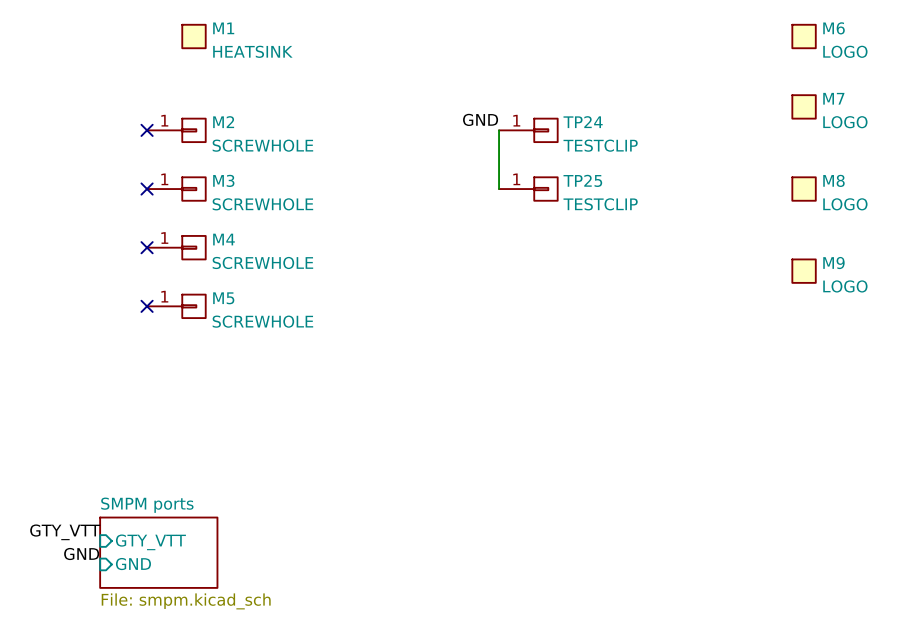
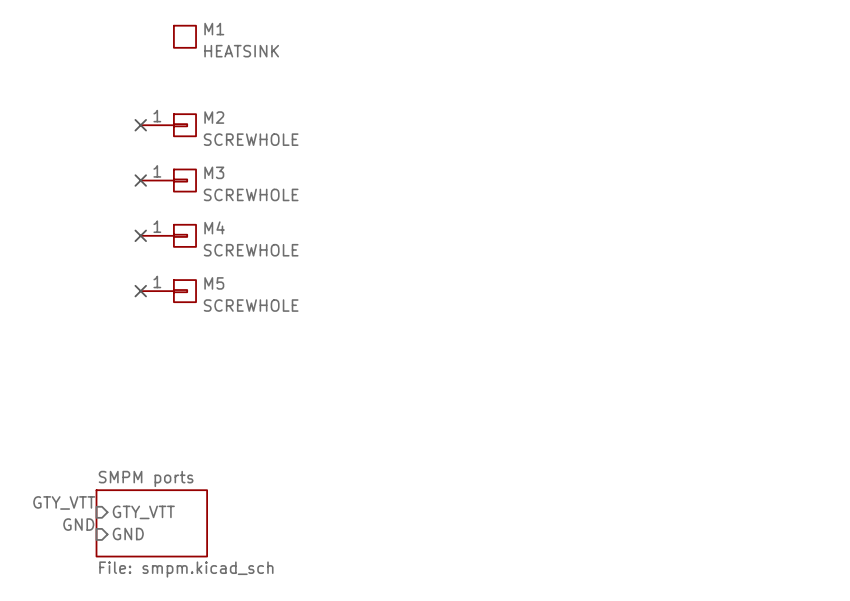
M6: LOGO (804, 36) -> none
M7: LOGO (804, 106) -> none
label: GND (480, 119) -> none
wire: (499, 130) (499, 189) -> none
TP24: TESTCLIP (528, 130) -> none
TP25: TESTCLIP (528, 189) -> none
M8: LOGO (804, 189) -> none
M9: LOGO (804, 271) -> none

